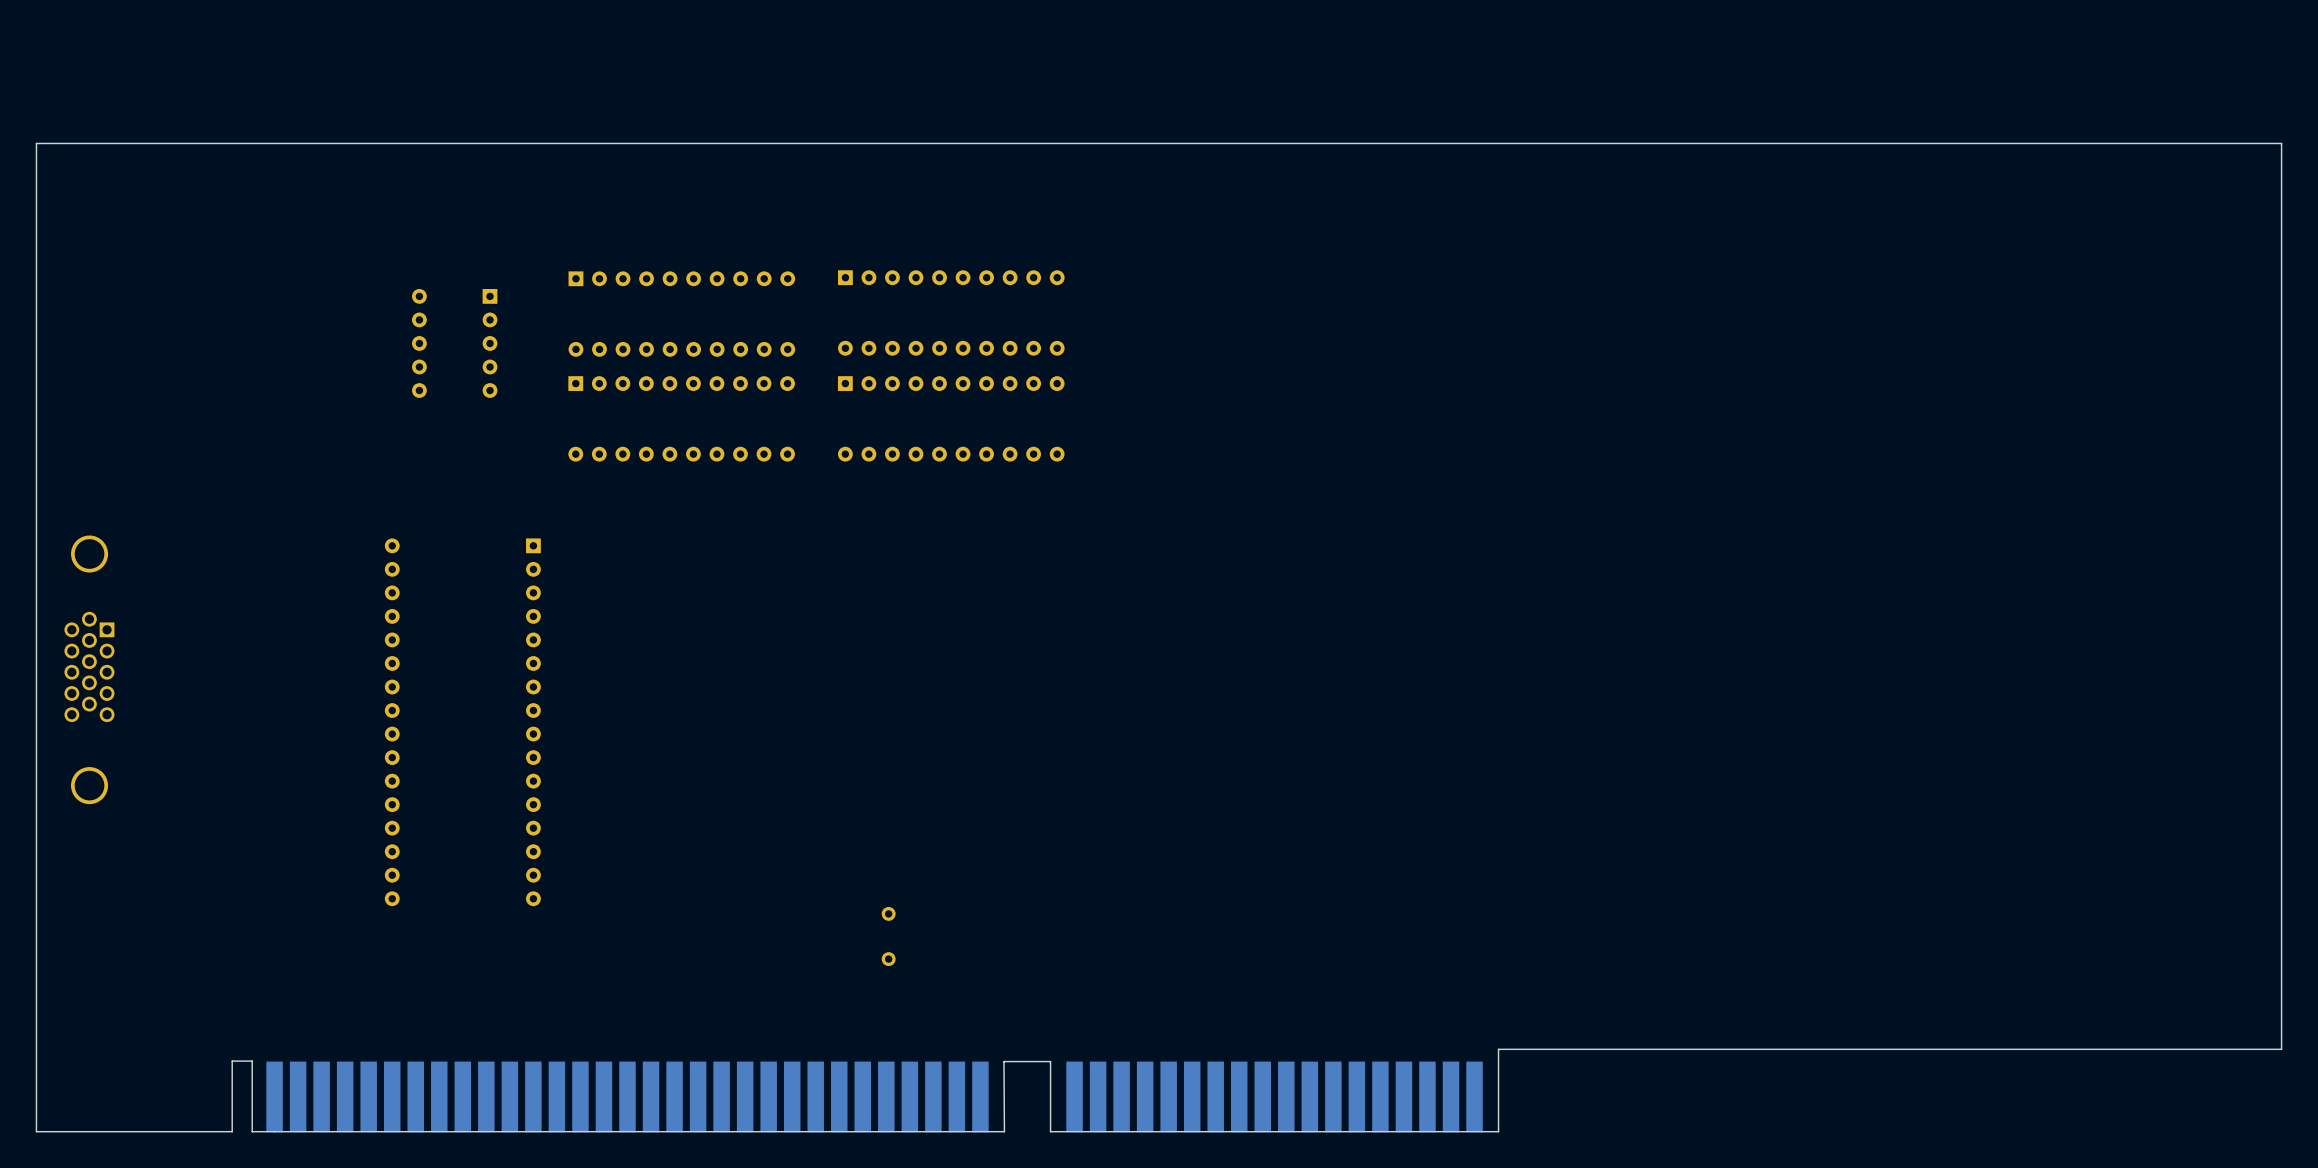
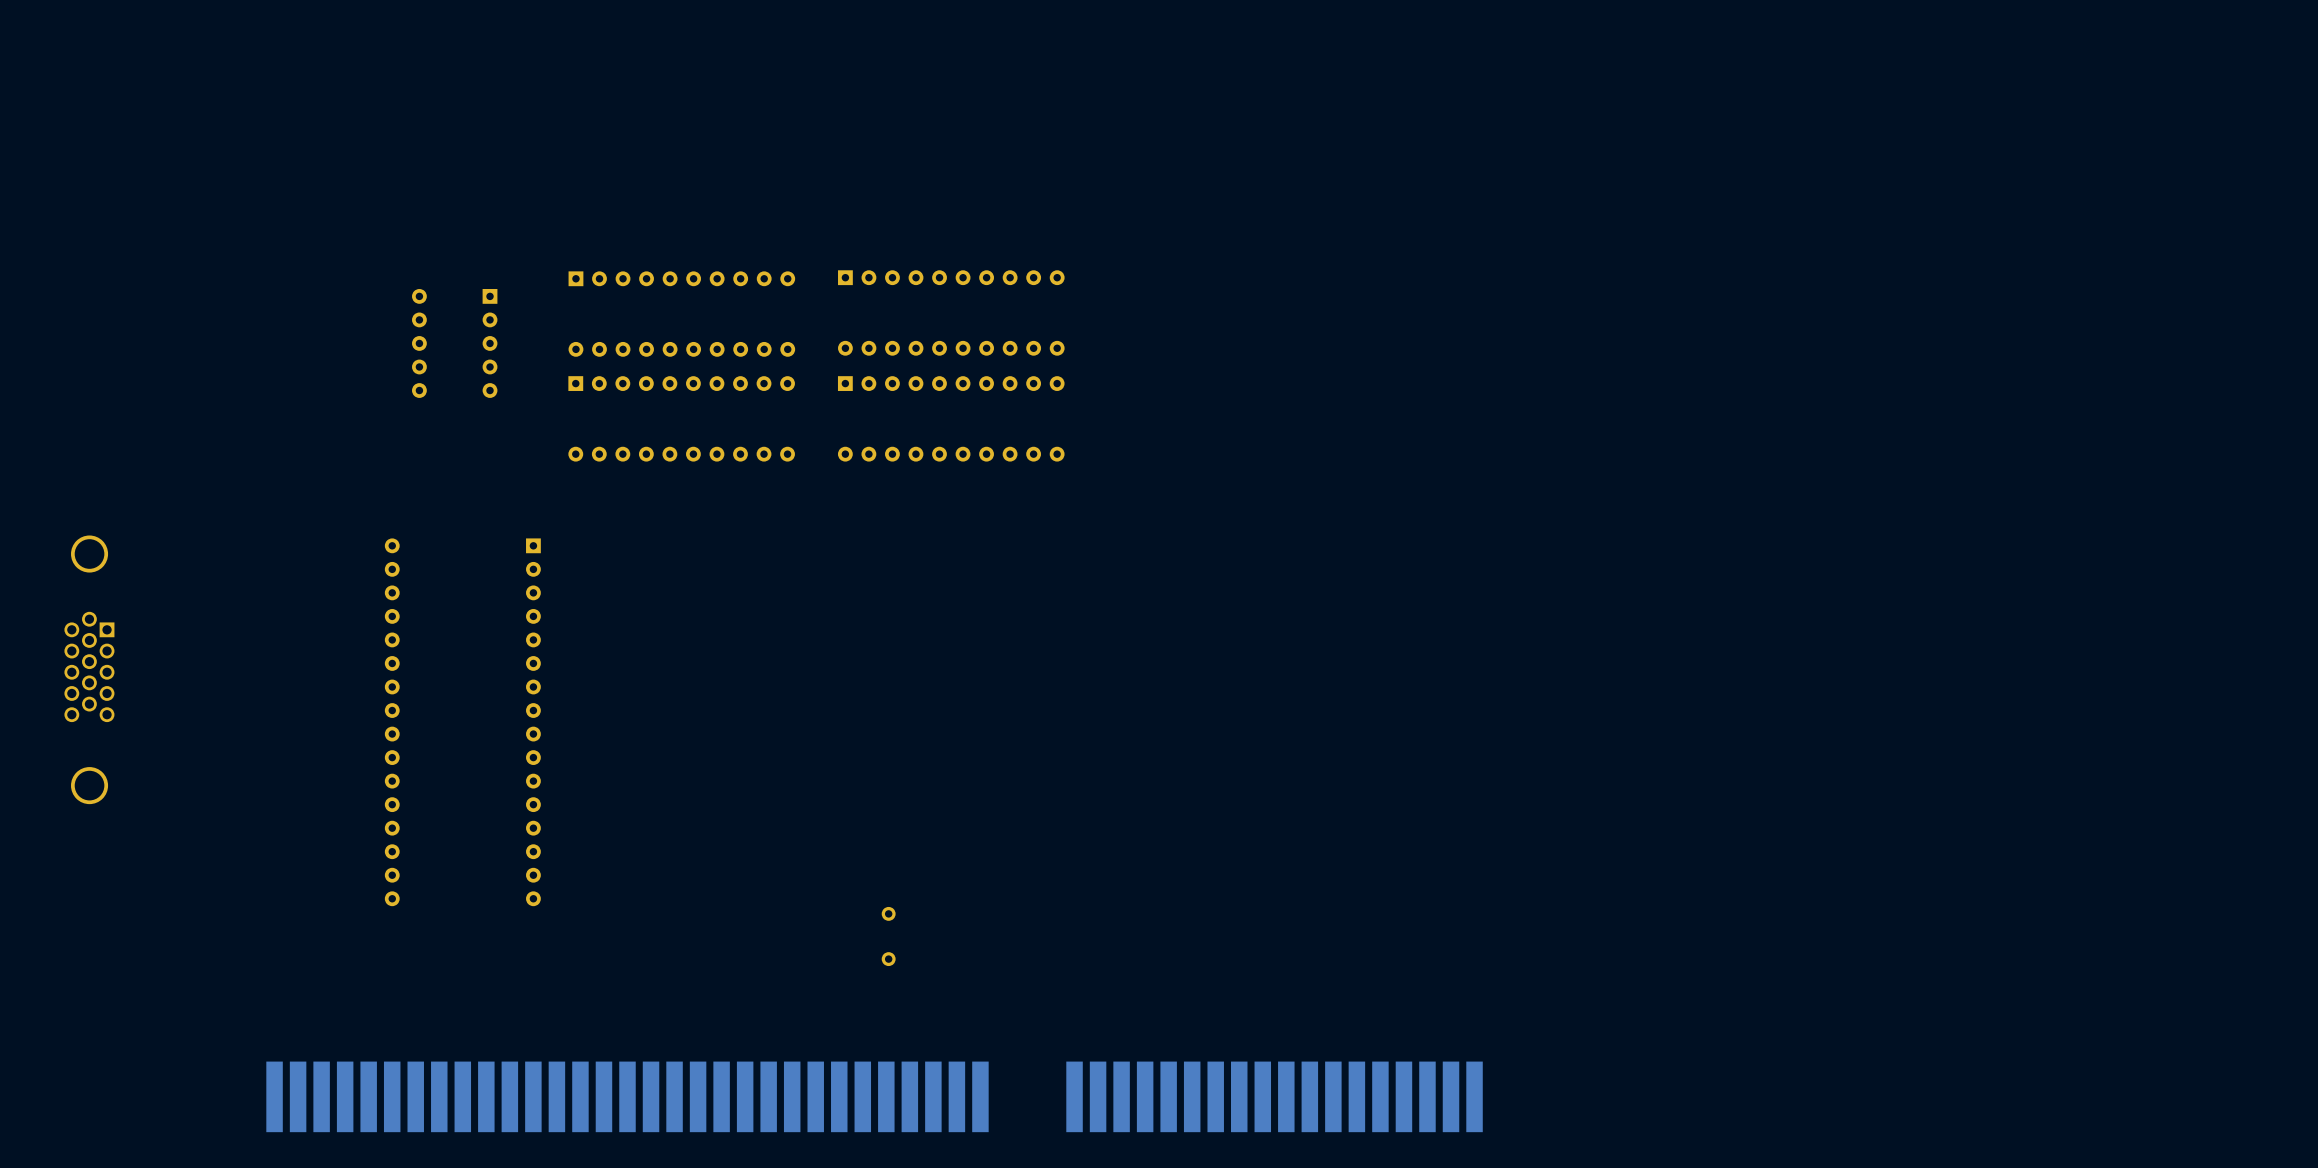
board edge: (2281, 143) (2281, 1049) (1498, 1049) (1498, 1131) (1050, 1131) (1050, 1061) (1003, 1061) (1004, 1131) (252, 1131) (252, 1061) (232, 1061) (232, 1131) (36, 1131) (36, 143) (2281, 143) -> none

